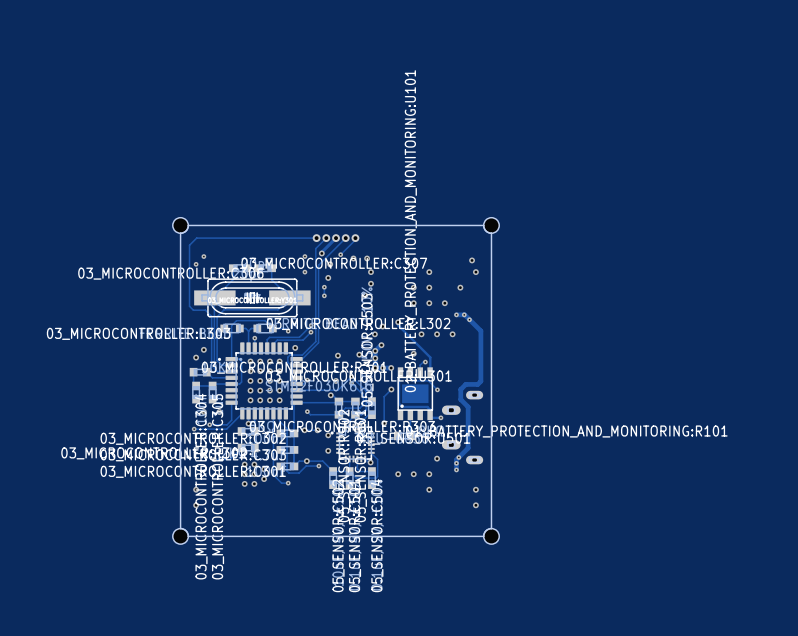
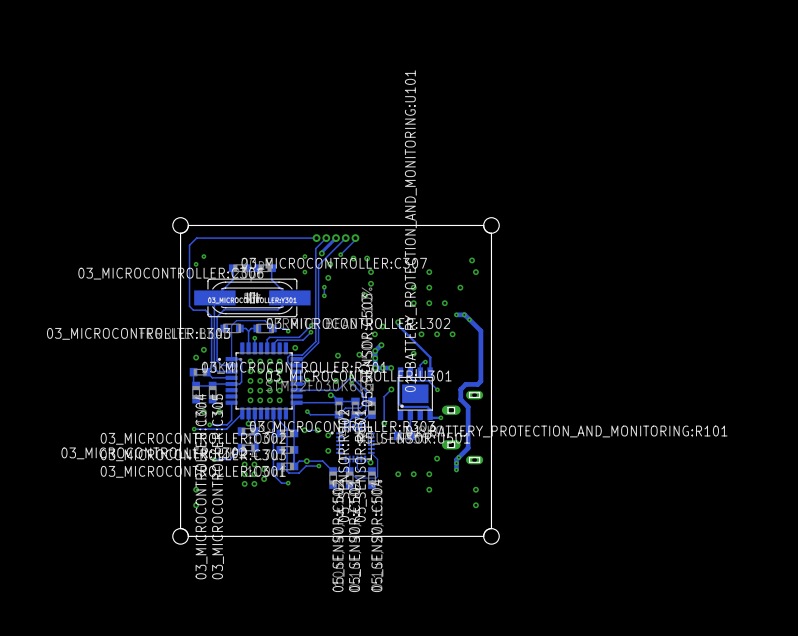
part footprint: [194, 278, 311, 318] -> [194, 278, 311, 318]

